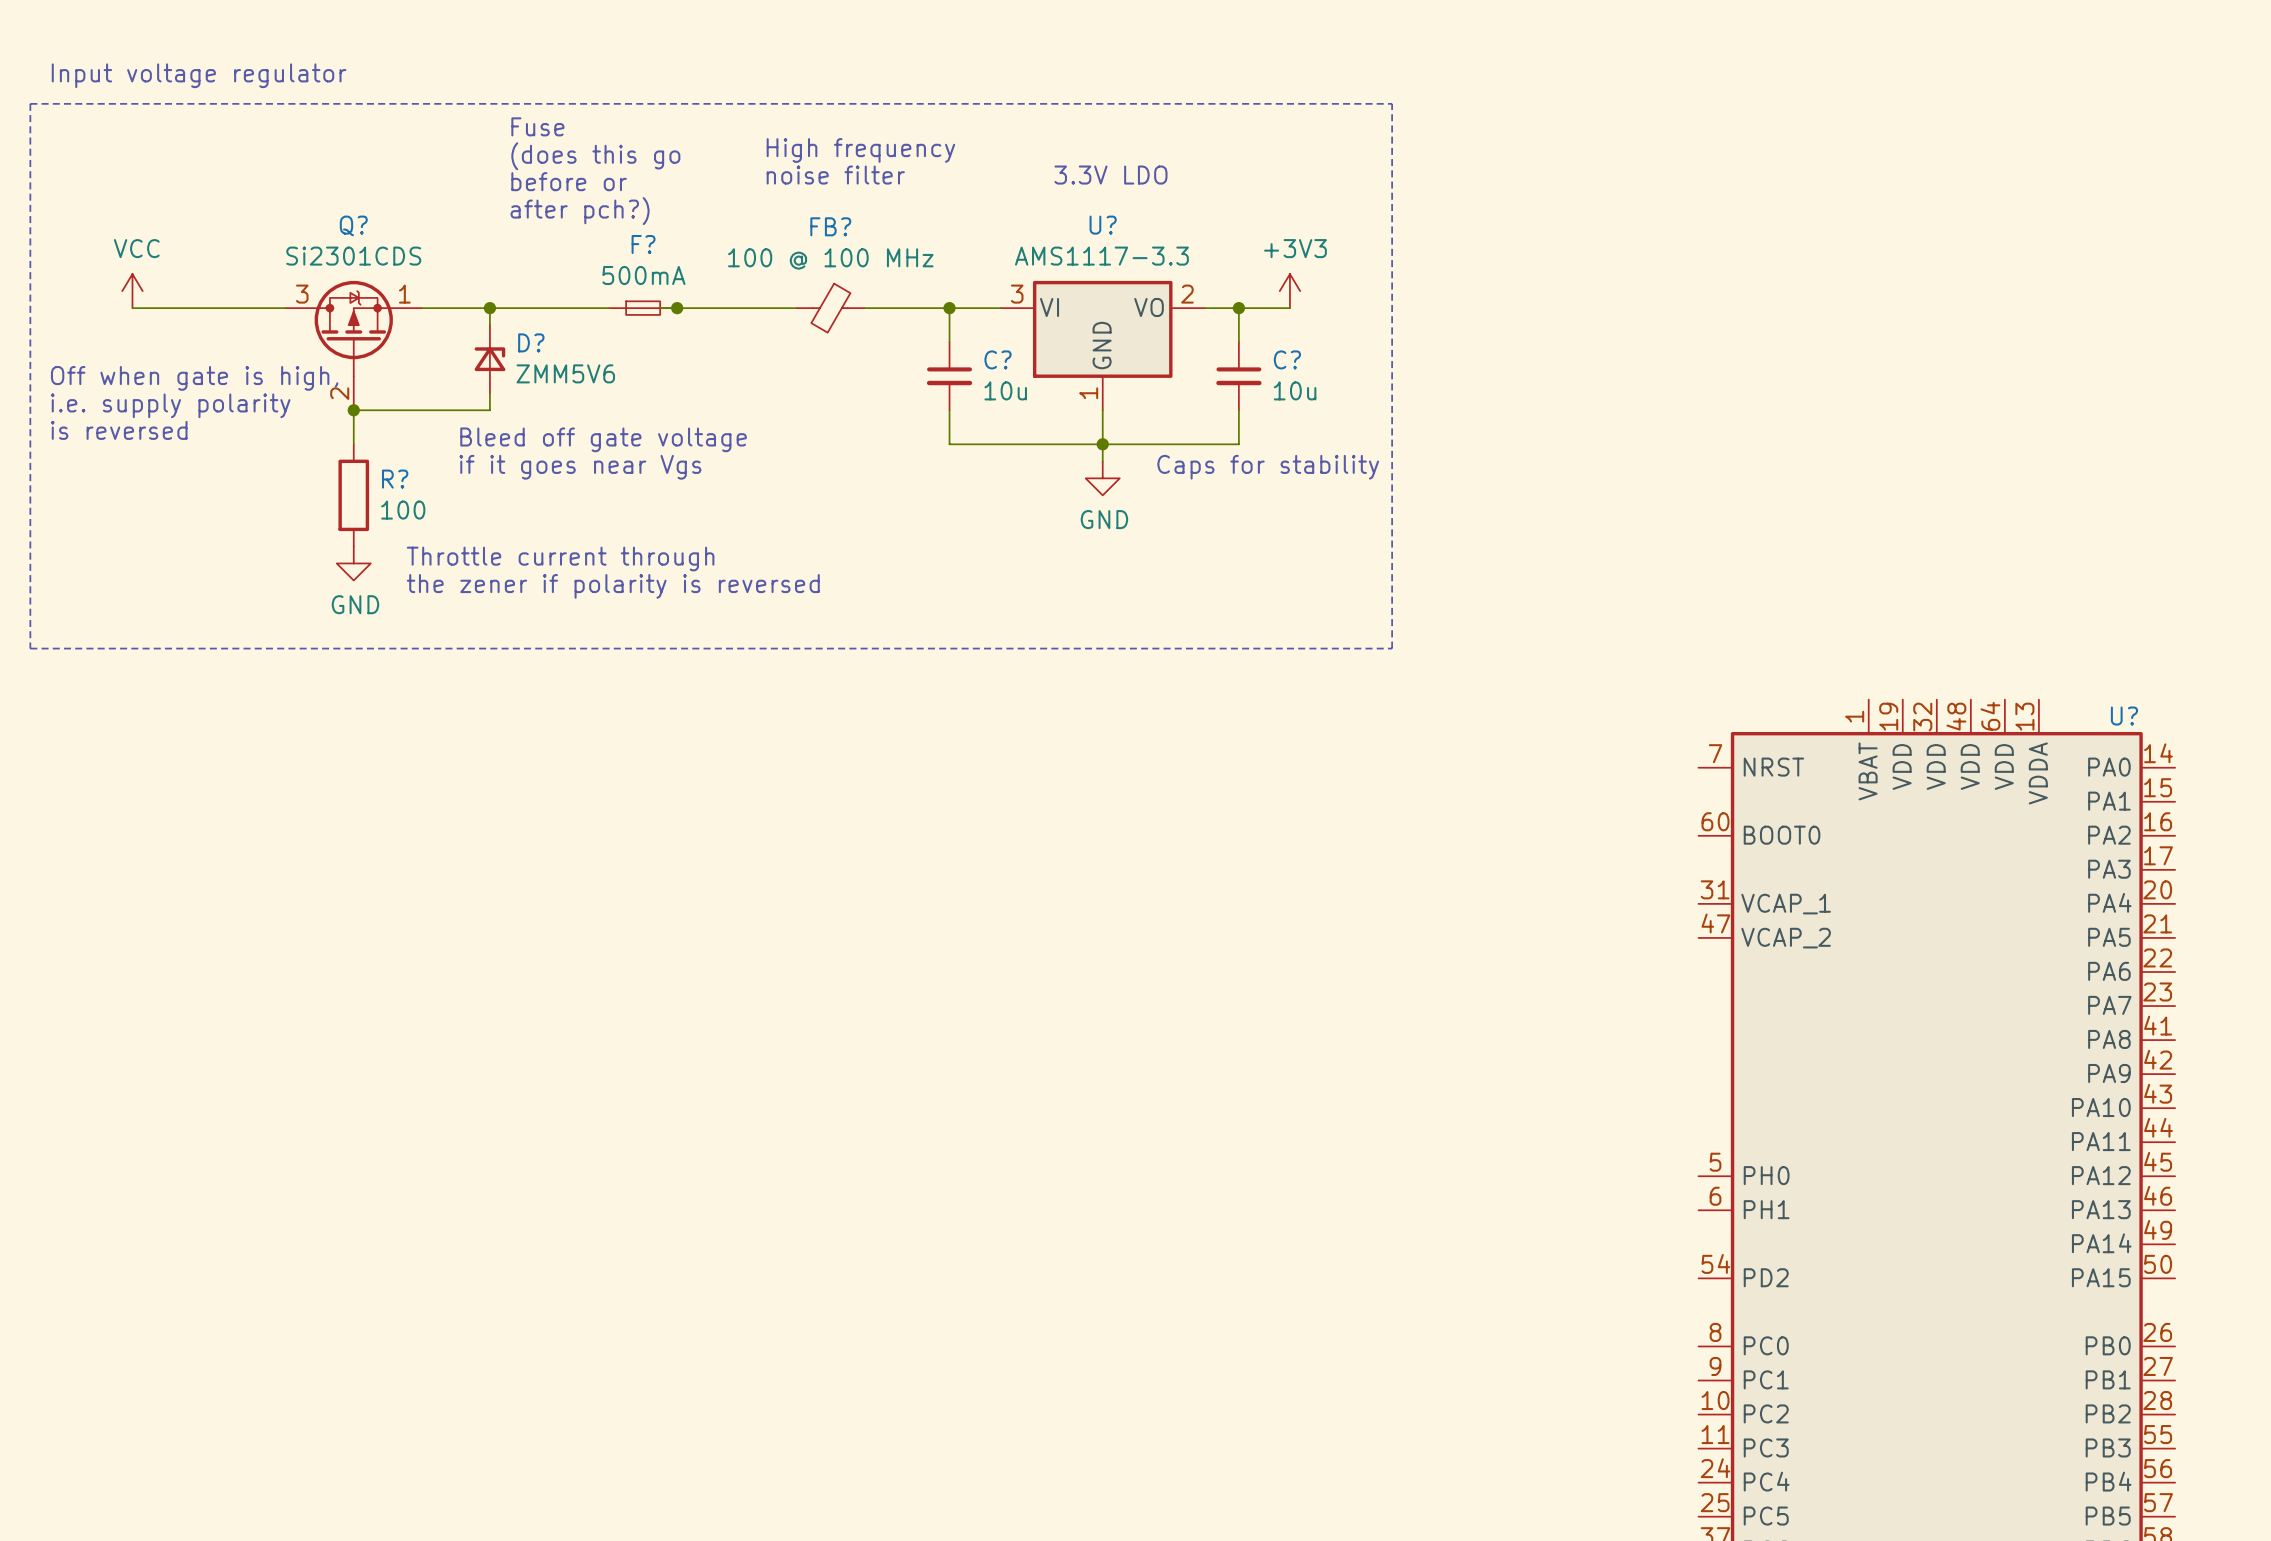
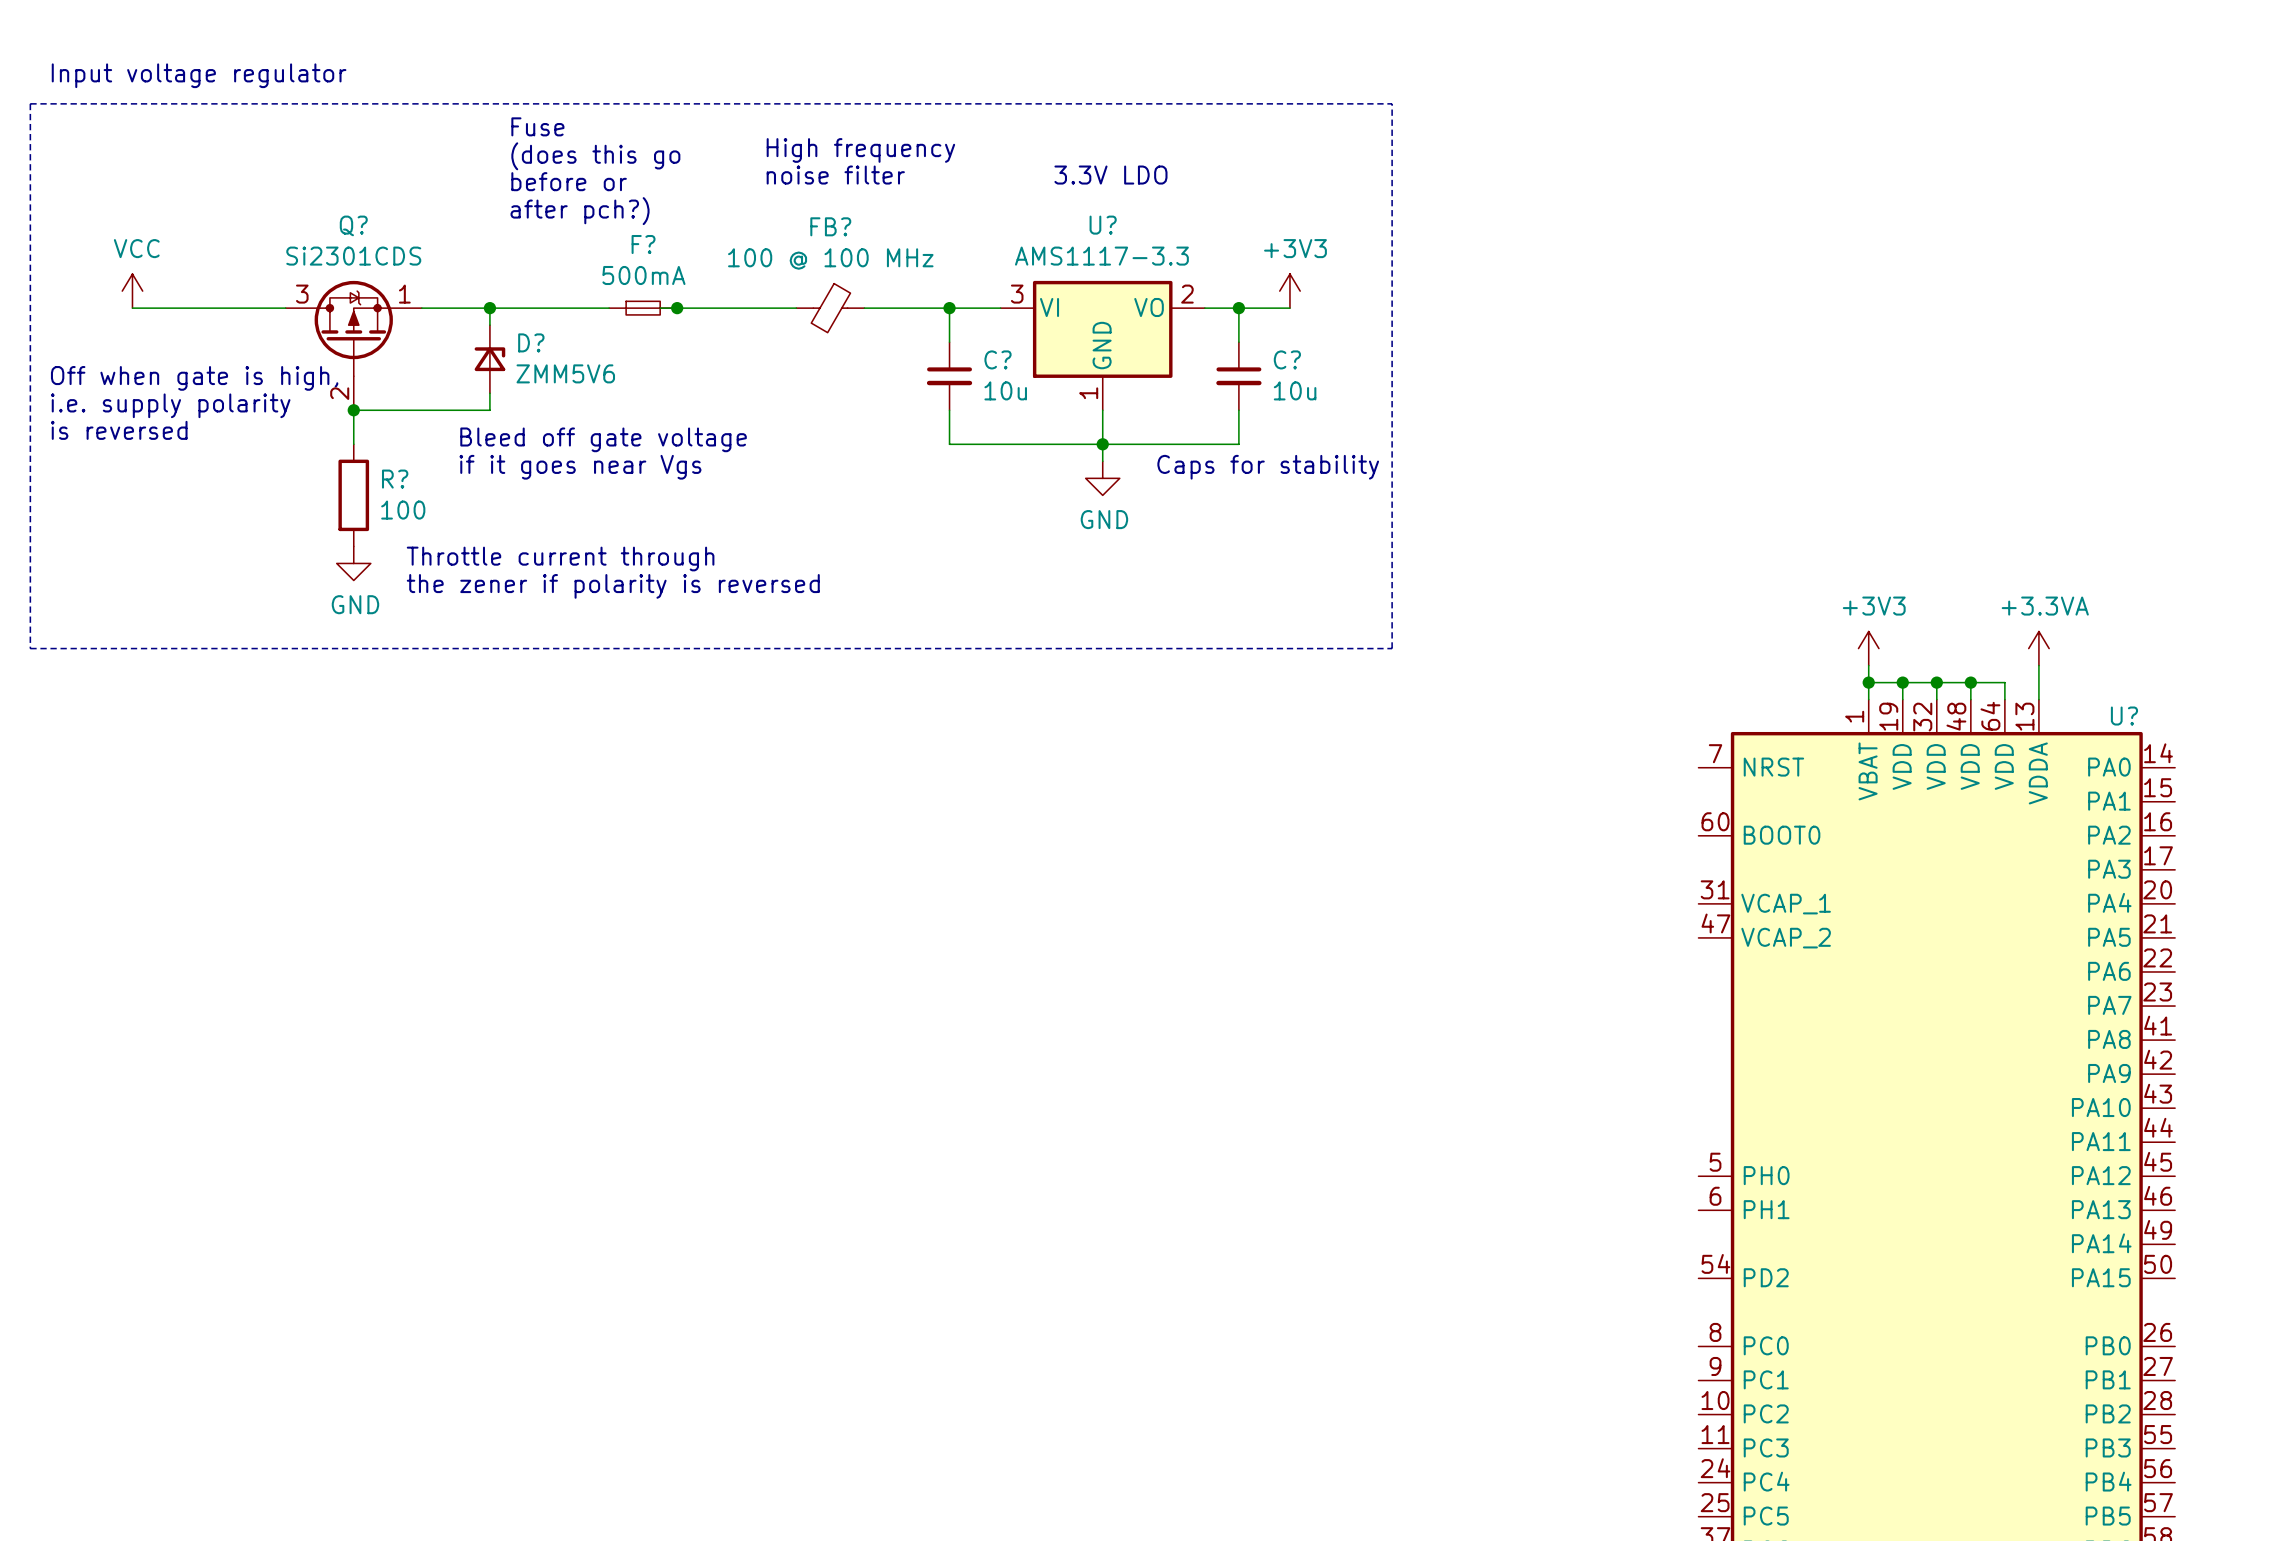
power symbol: none -> +3V3 (1868, 648)
power symbol: none -> +3.3VA (2038, 648)
wire: none -> (1868, 665) (1868, 699)
wire: none -> (2038, 665) (2038, 699)
wire: none -> (1868, 682) (2004, 682) (2004, 699)
junction: none -> (1868, 682)
wire: none -> (1902, 682) (1902, 699)
junction: none -> (1902, 682)
wire: none -> (1936, 682) (1936, 699)
junction: none -> (1936, 682)
wire: none -> (1970, 682) (1970, 699)
junction: none -> (1970, 682)

